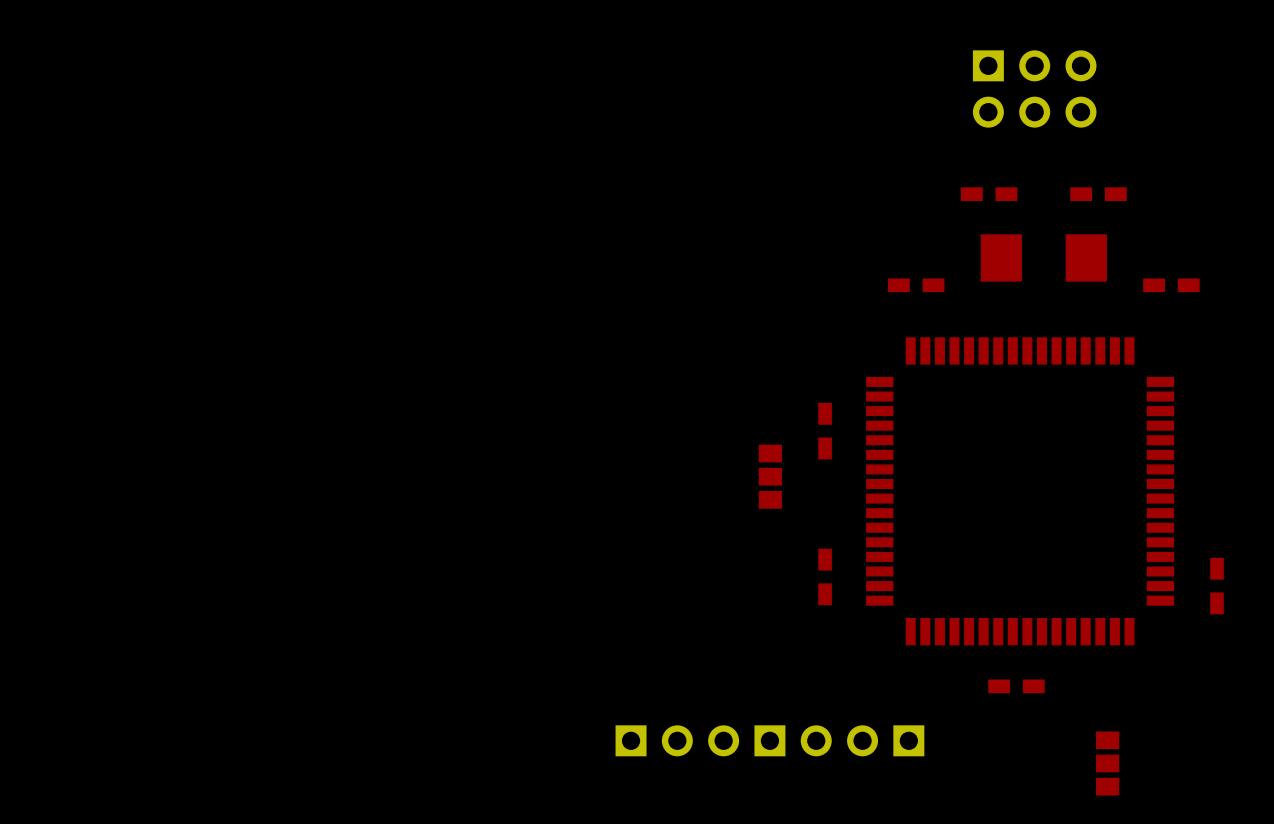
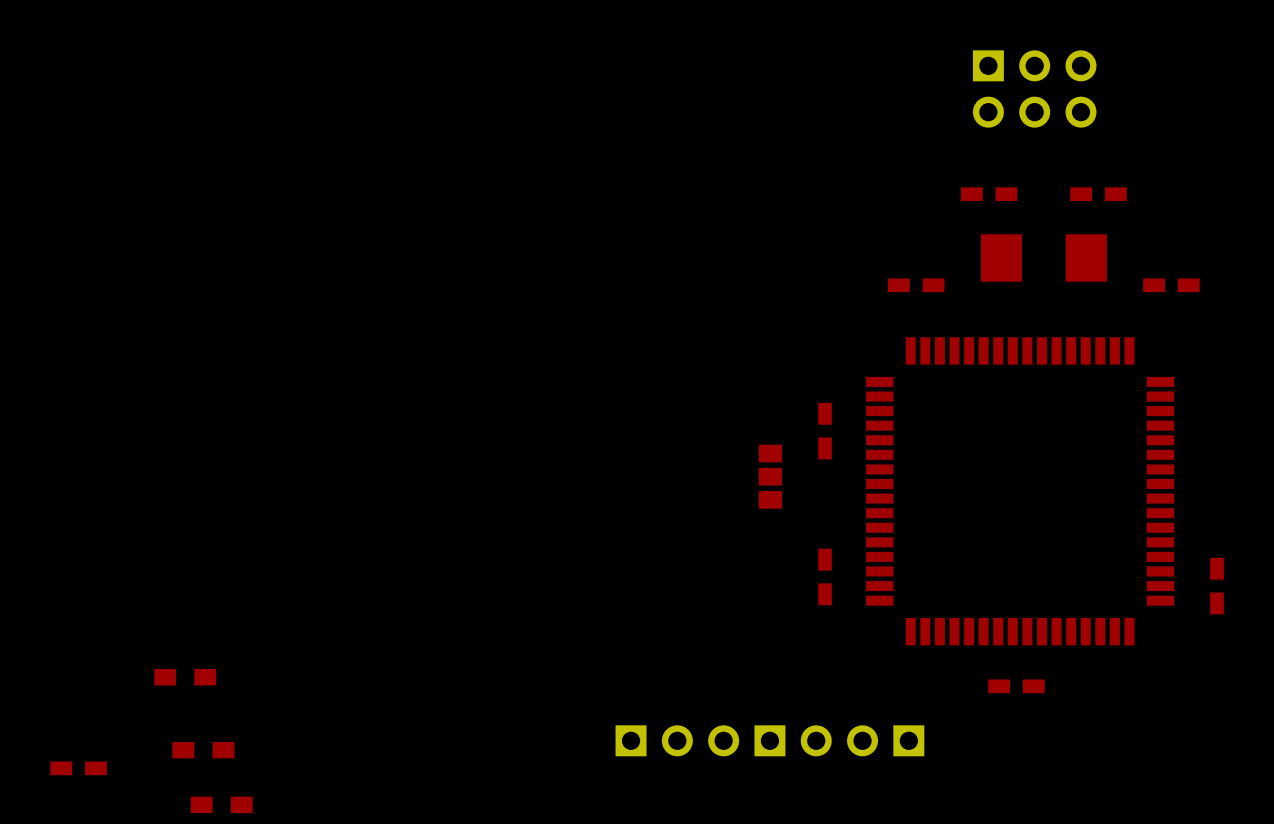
part: none -> (185, 677)
part: none -> (203, 750)
part: (1107, 763) -> none
part: none -> (78, 768)
part: none -> (221, 804)

